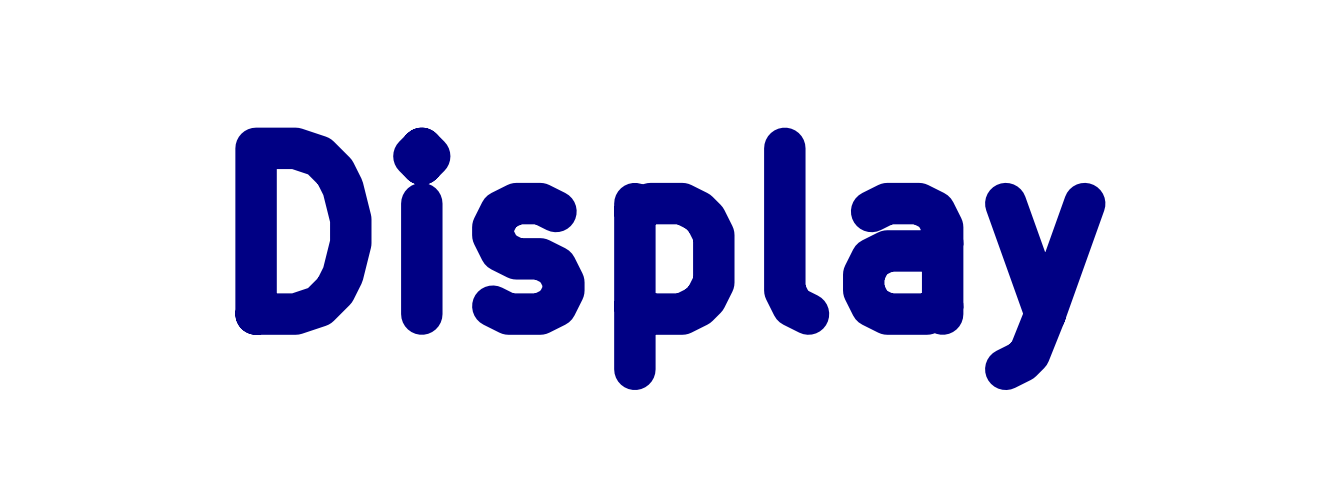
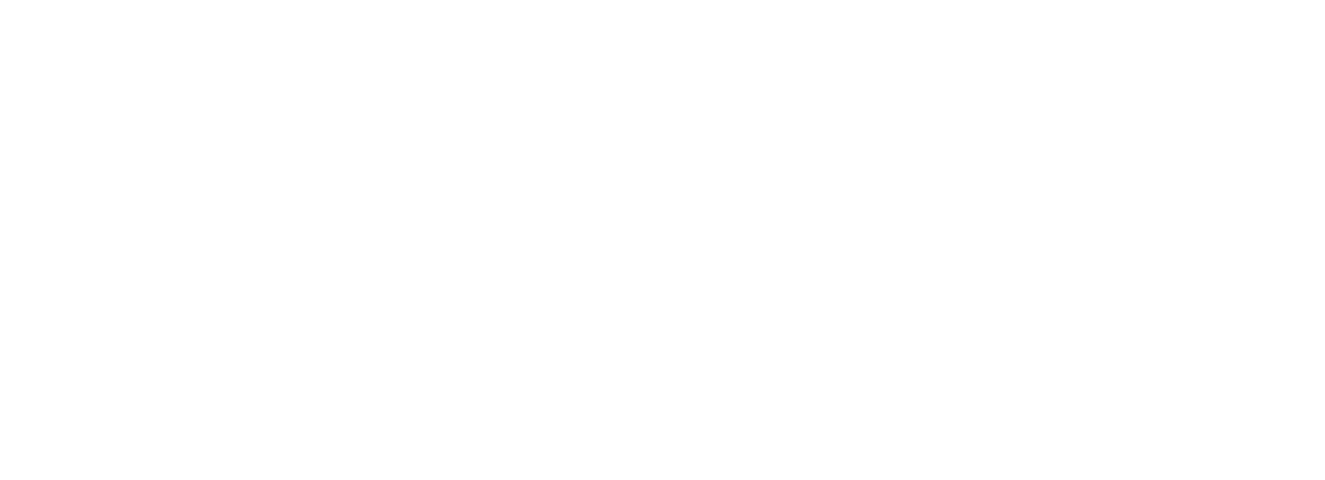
text: Display (670, 258) -> none

